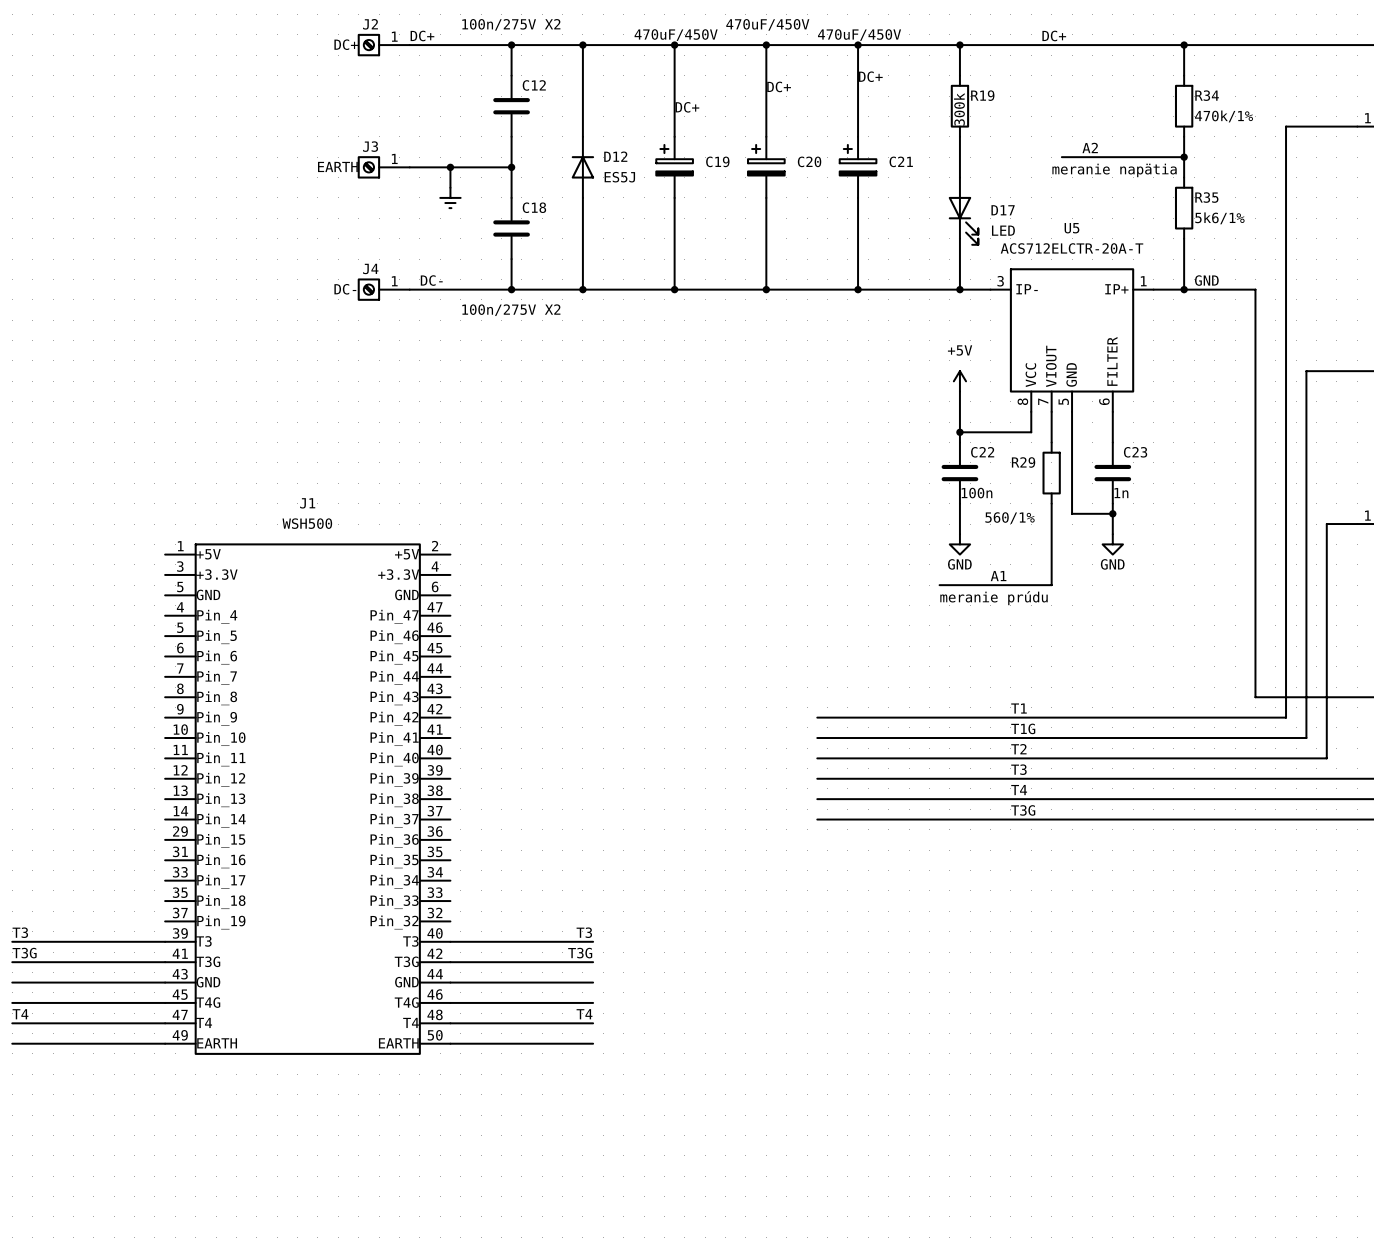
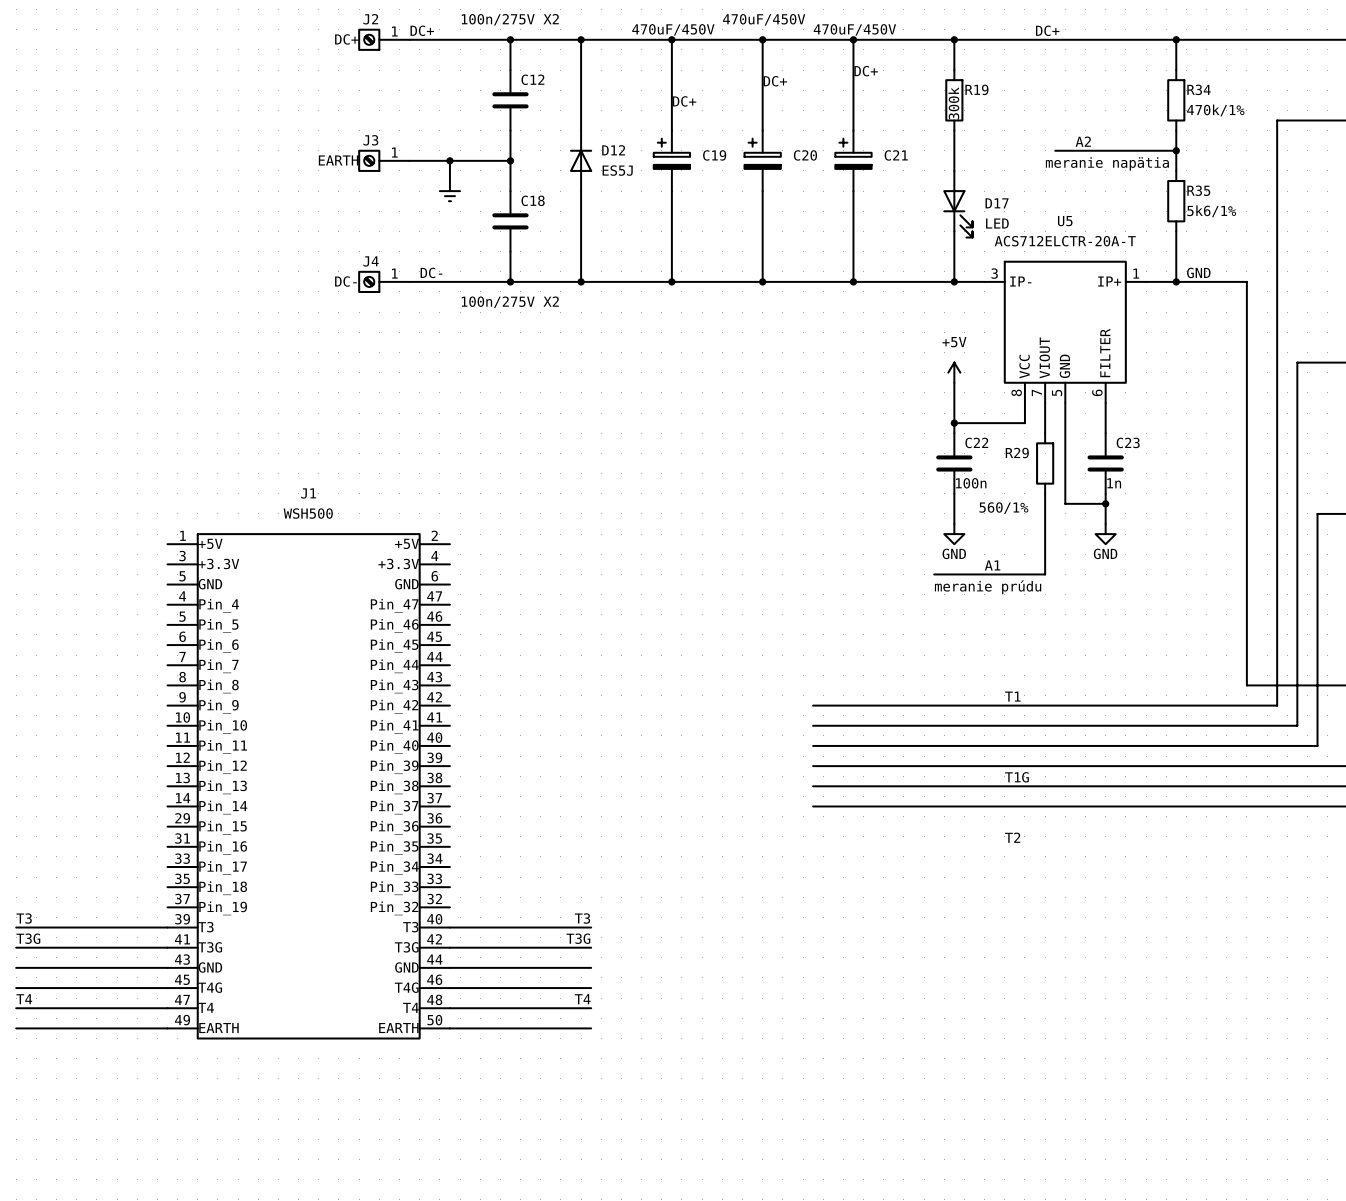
label: T1G (1023, 728) -> none
label position: T2 (1018, 749) -> T2 (1012, 837)
label: T3 (1018, 769) -> none
label: T4 (1019, 790) -> T1G (1017, 777)
label: T3G (1023, 810) -> none

